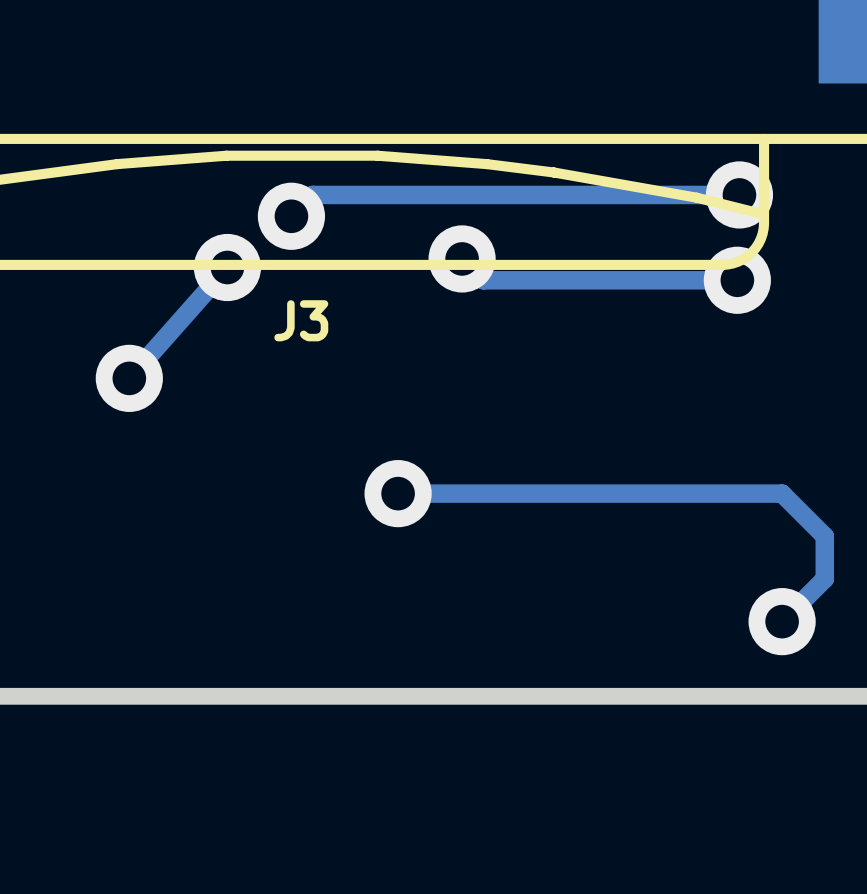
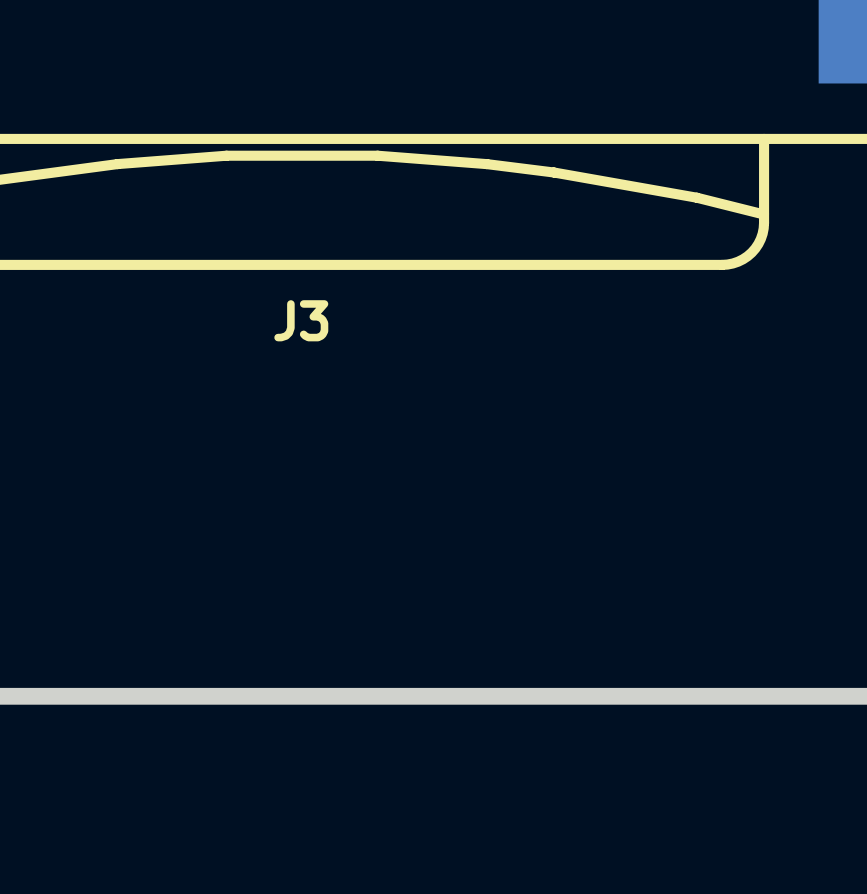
track: (739, 194) (312, 194) (291, 216) -> none
via: (739, 194) -> none
via: (291, 216) -> none
track: (462, 258) (483, 280) (737, 280) -> none
via: (462, 258) -> none
track: (227, 267) (129, 378) (129, 365) -> none
via: (227, 267) -> none
via: (737, 280) -> none
via: (129, 378) -> none
track: (398, 493) (782, 493) (824, 536) (824, 578) (782, 621) -> none
via: (398, 493) -> none
via: (782, 621) -> none

